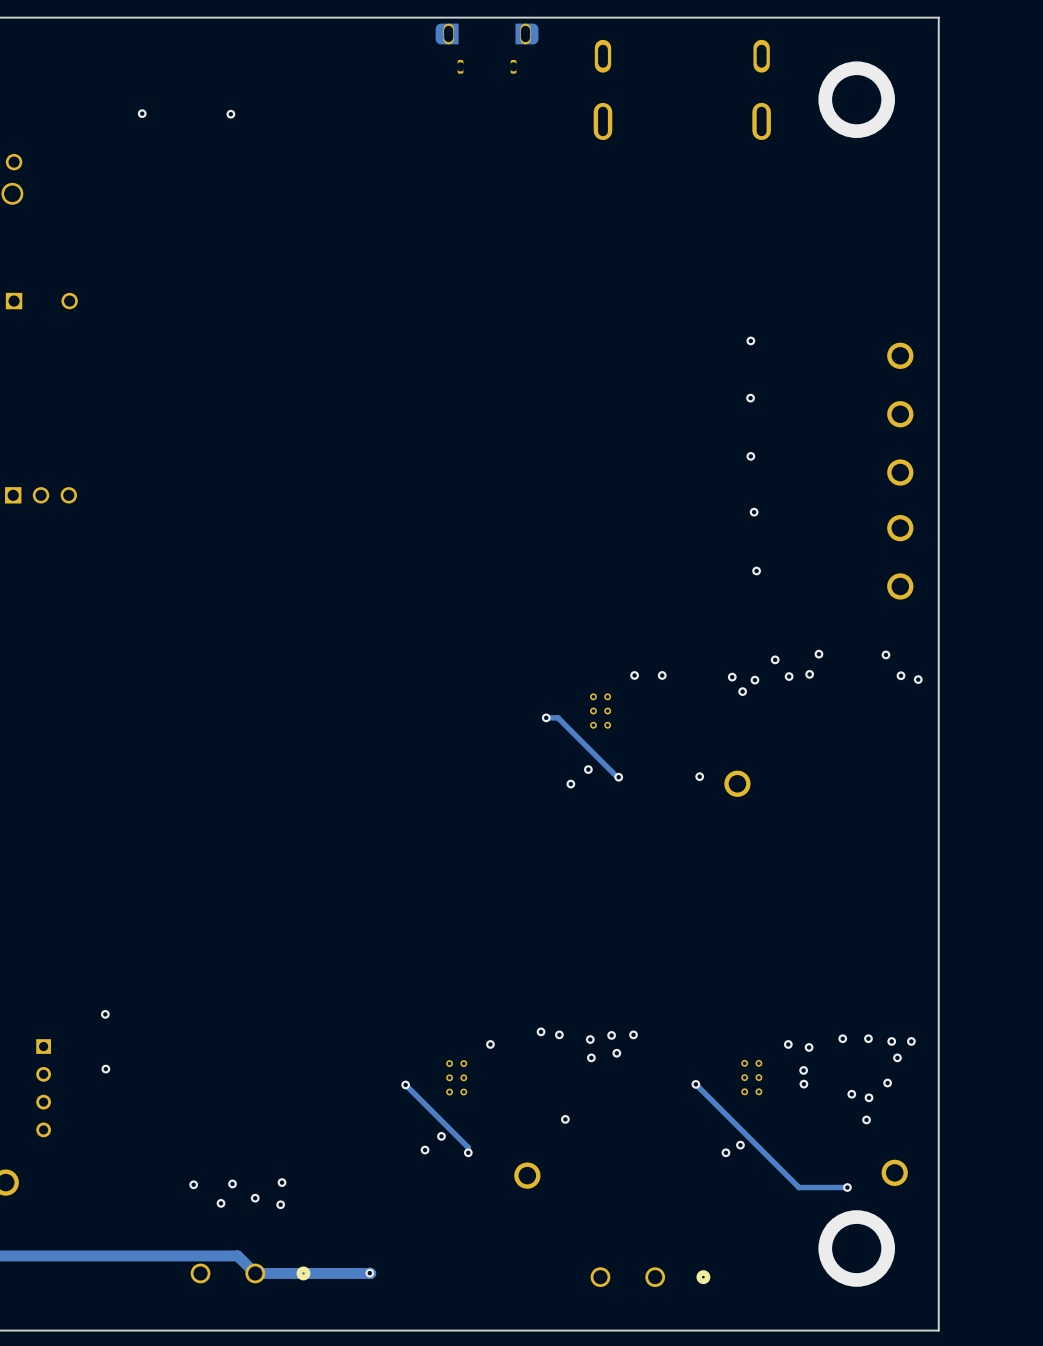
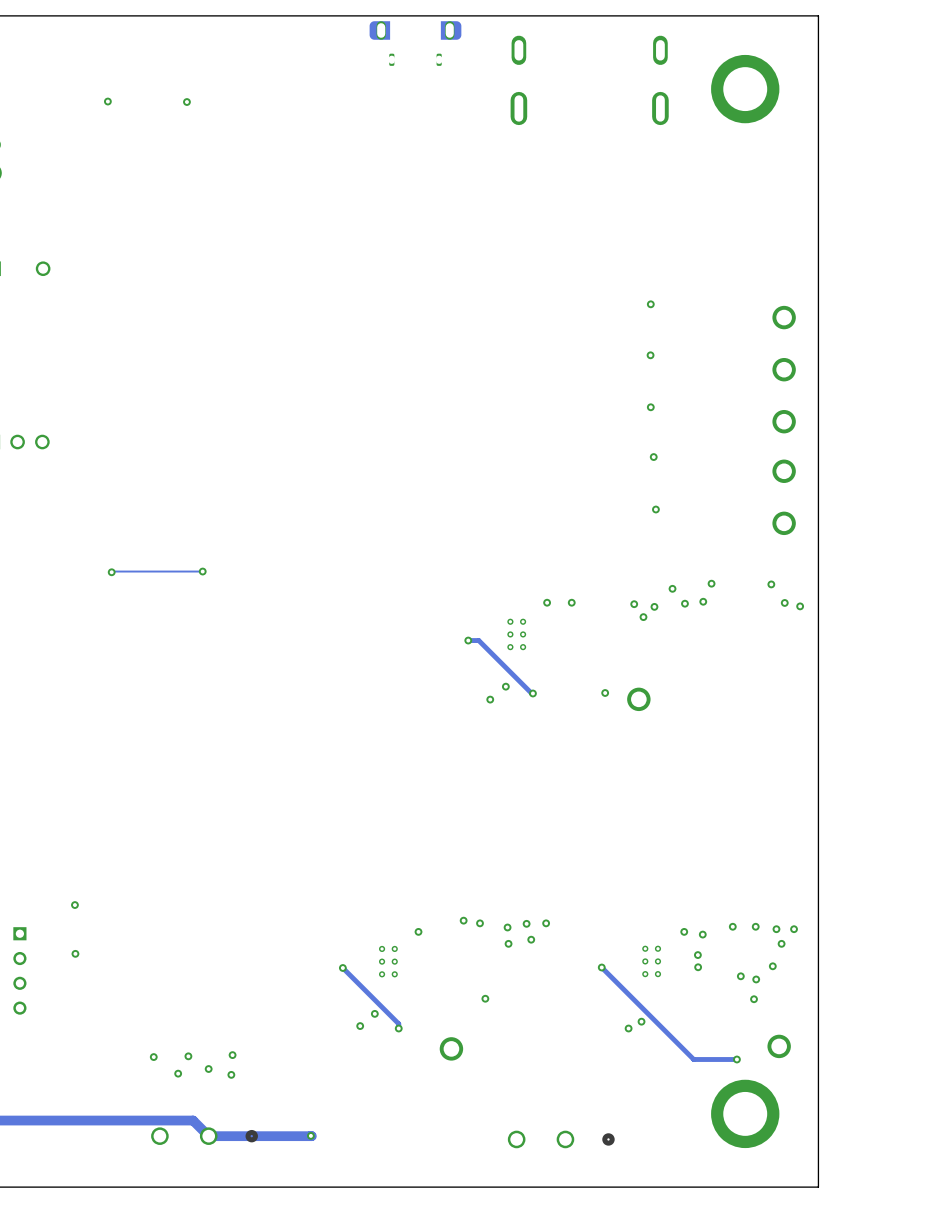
track: none -> (202, 571) (111, 572)
via: none -> (202, 571)
via: none -> (111, 572)

